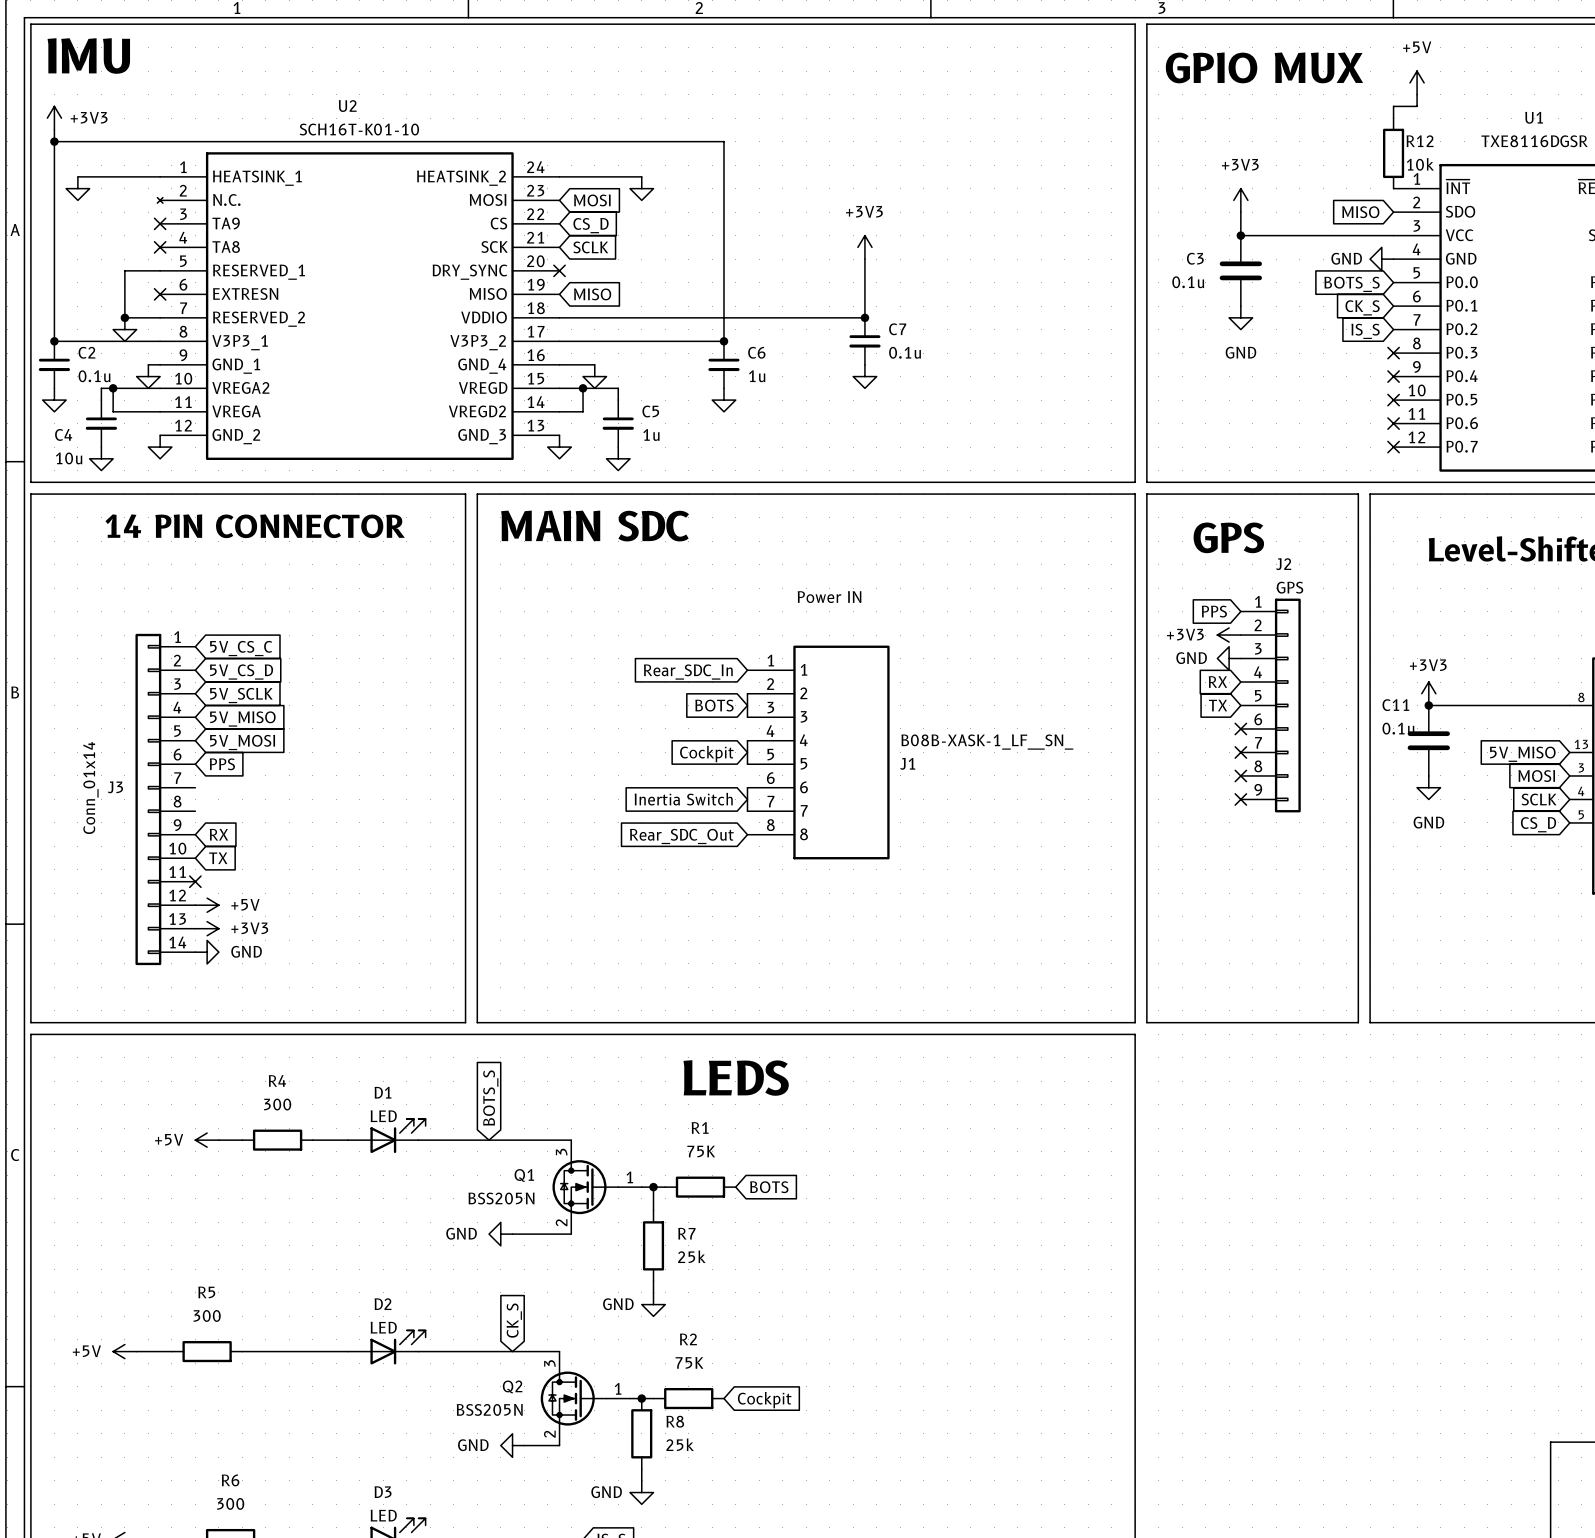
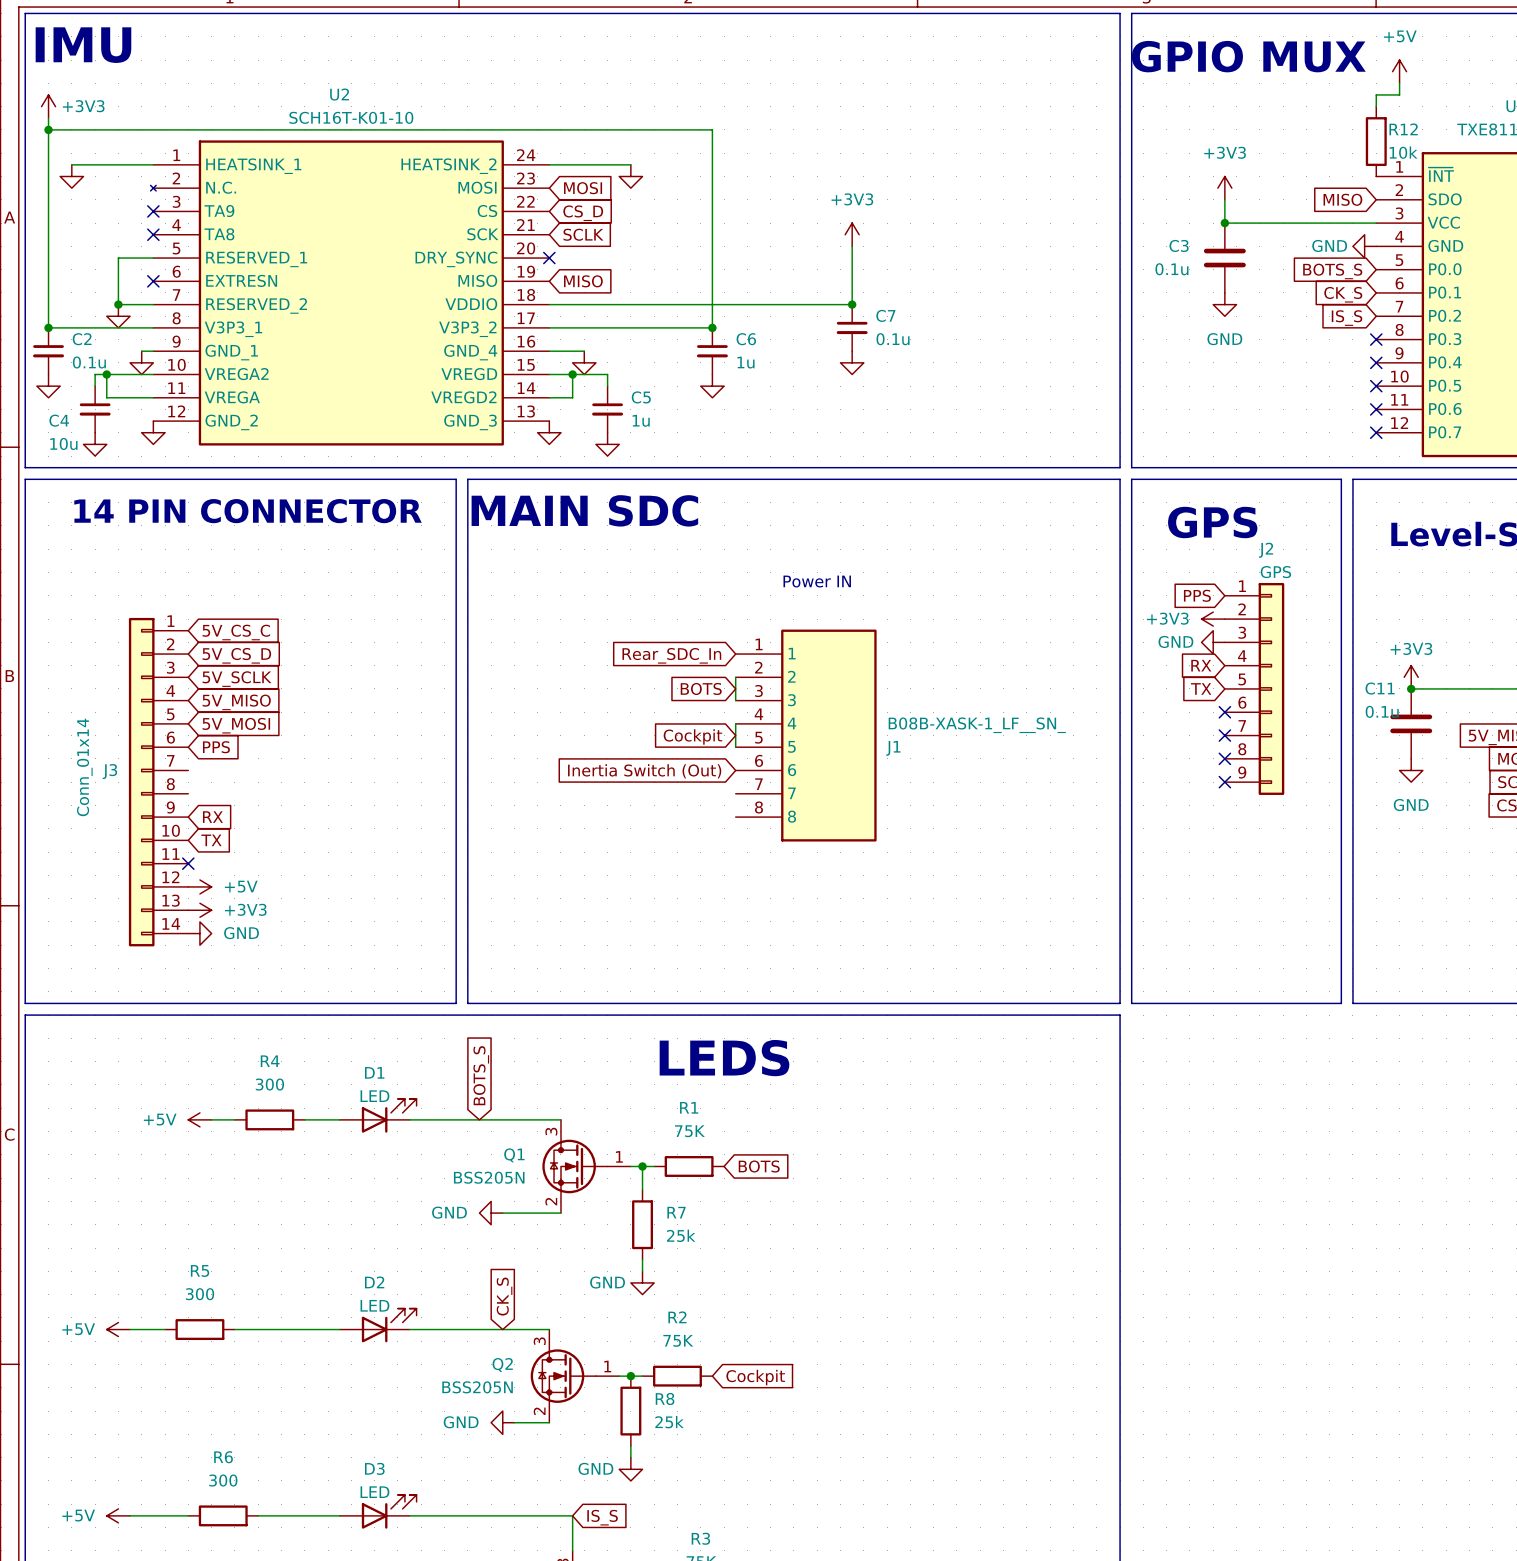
wire: (747, 787) (747, 811) -> none
global label: Inertia Switch (683, 799) -> Inertia Switch (Out) (644, 771)
global label: Rear_SDC_Out (681, 836) -> none

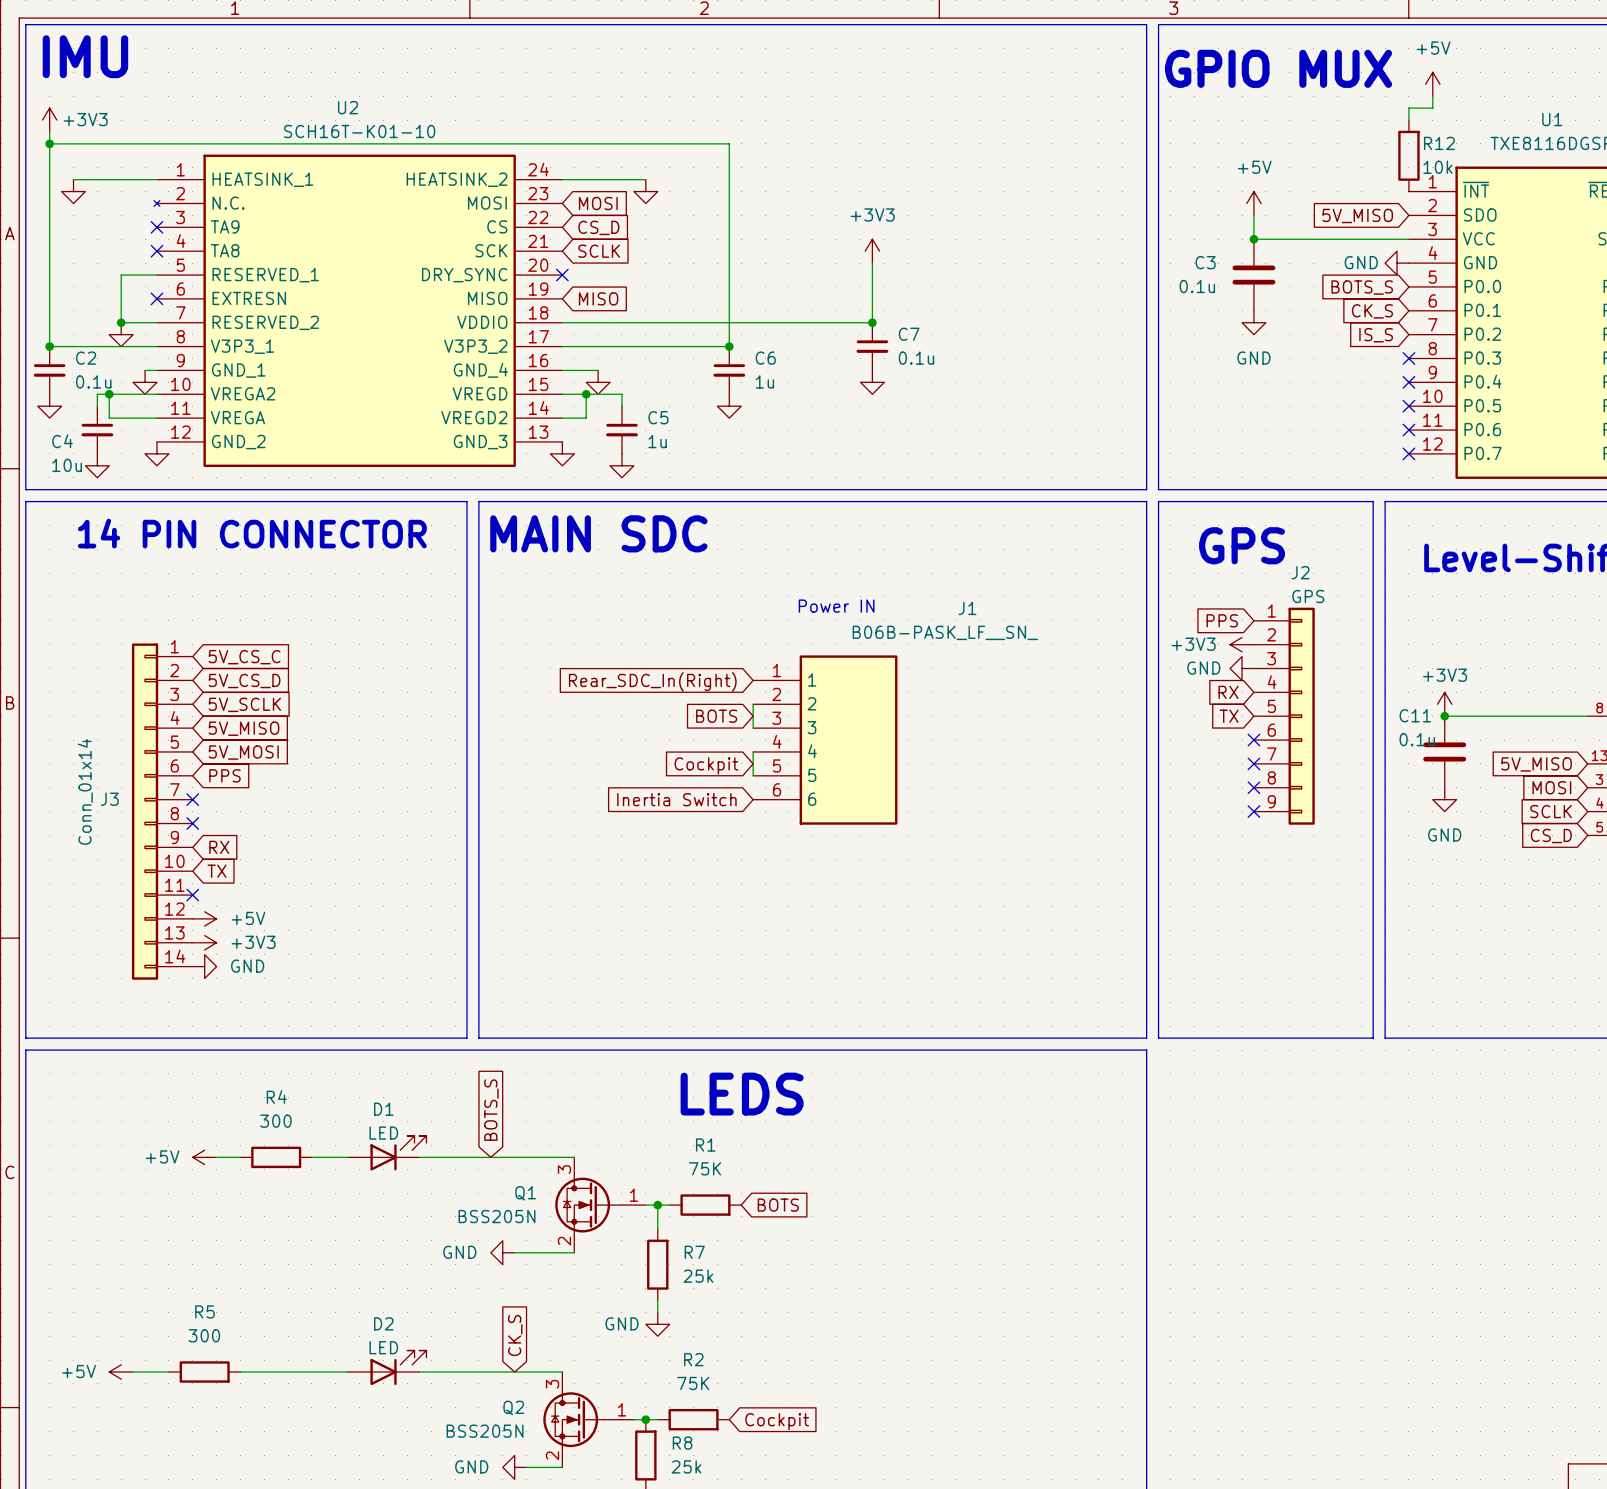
power symbol: +3V3 (1224, 188) -> +5V (1253, 203)
global label: MISO (1342, 199) -> 5V_MISO (1357, 215)
J1 symbol: [735, 629, 877, 842] -> [753, 655, 898, 825]
global label: Rear_SDC_In (671, 655) -> Rear_SDC_In(Right) (652, 681)
J1 value: B08B-XASK-1_LF__SN_ (977, 725) -> B06B-PASK_LF__SN_ (945, 632)
J1 name position: J1 (893, 748) -> J1 (967, 608)
no-connect mark: none -> (192, 799)
global label: Inertia Switch (Out) (644, 771) -> Inertia Switch (676, 799)
no-connect mark: none -> (192, 823)

